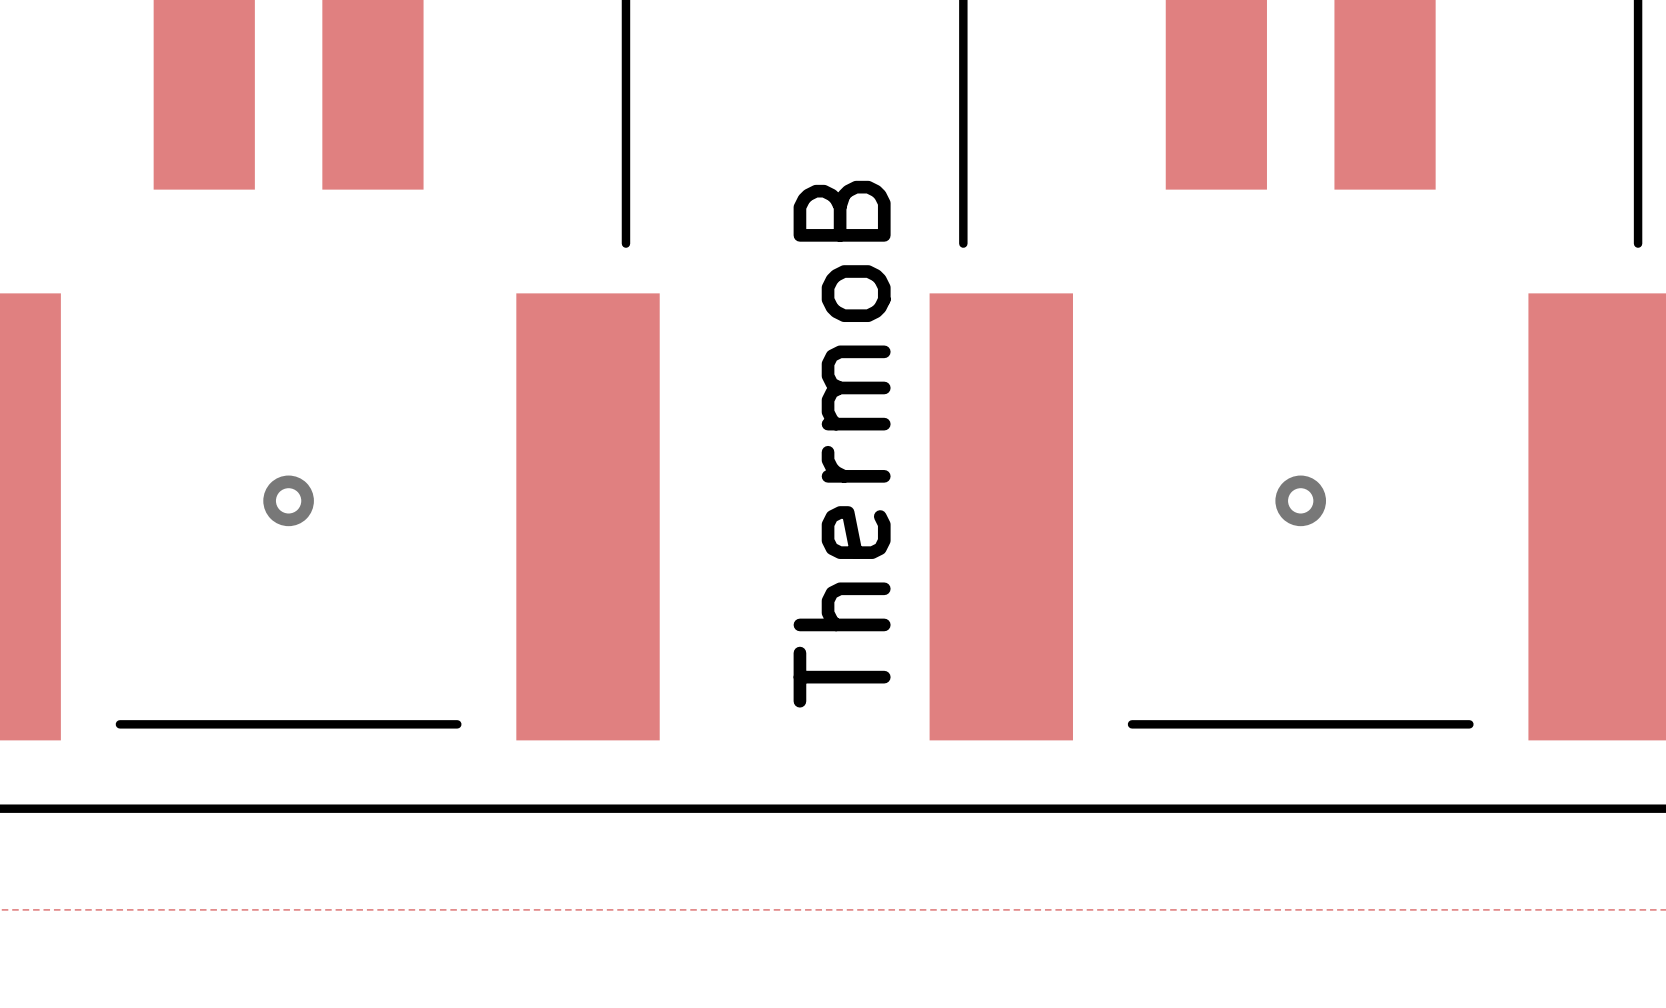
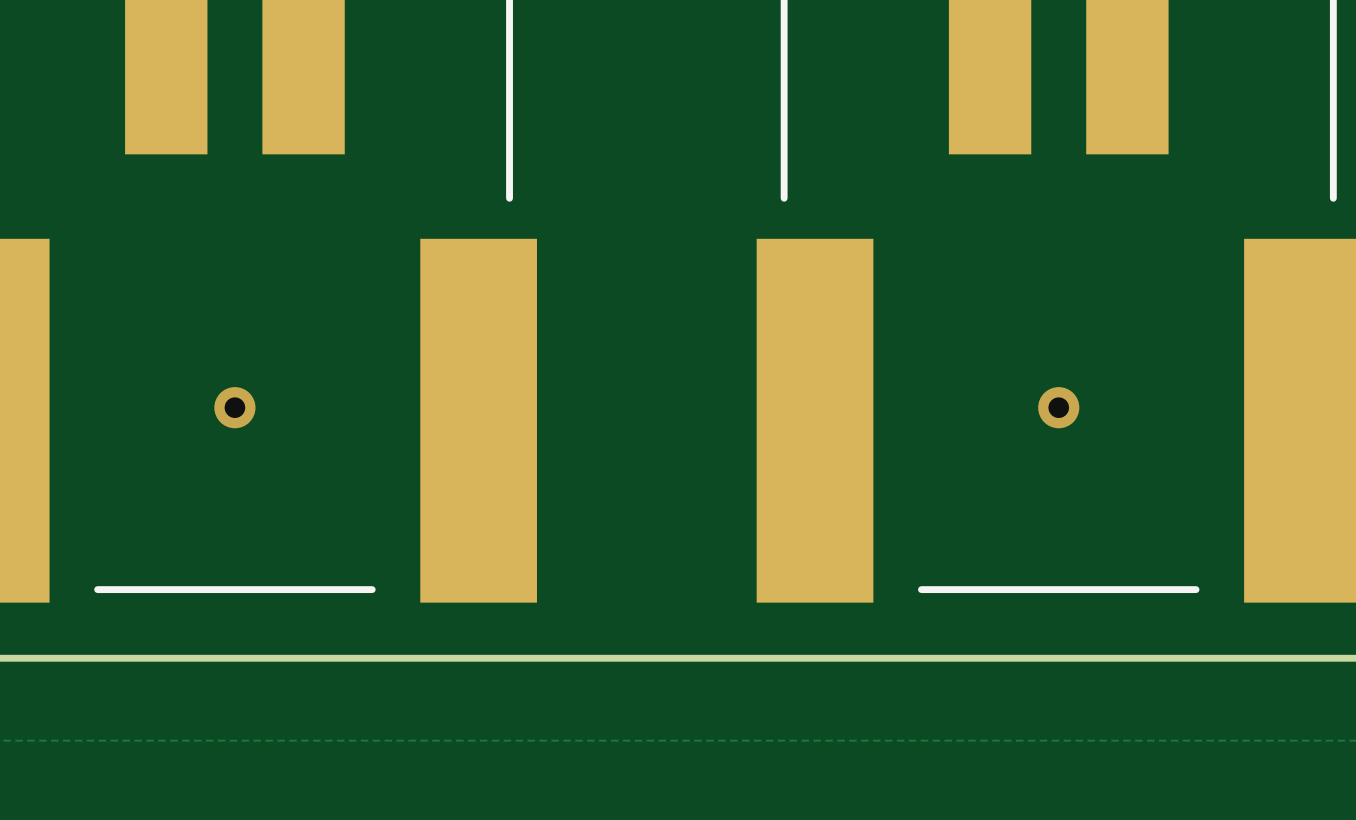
text: ThermoB (842, 444) -> none

